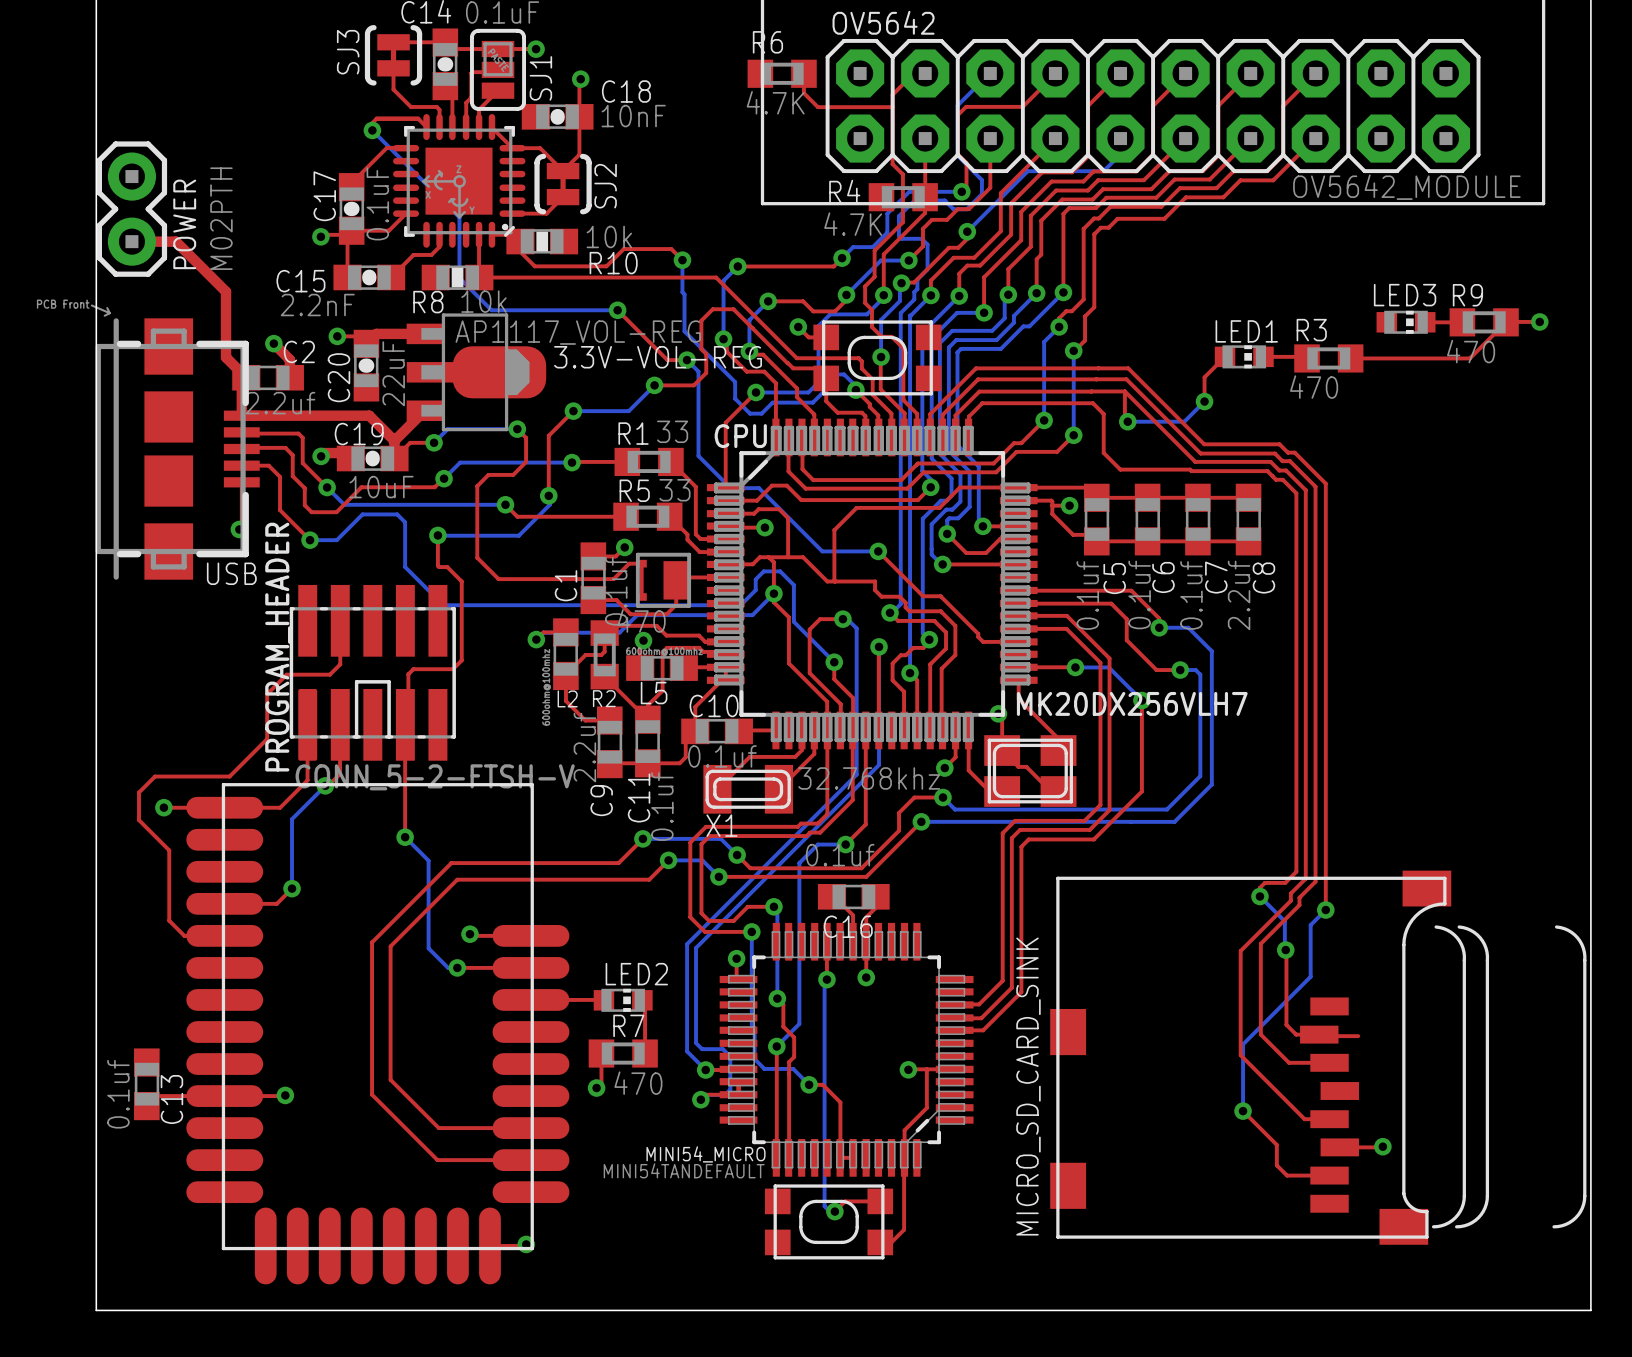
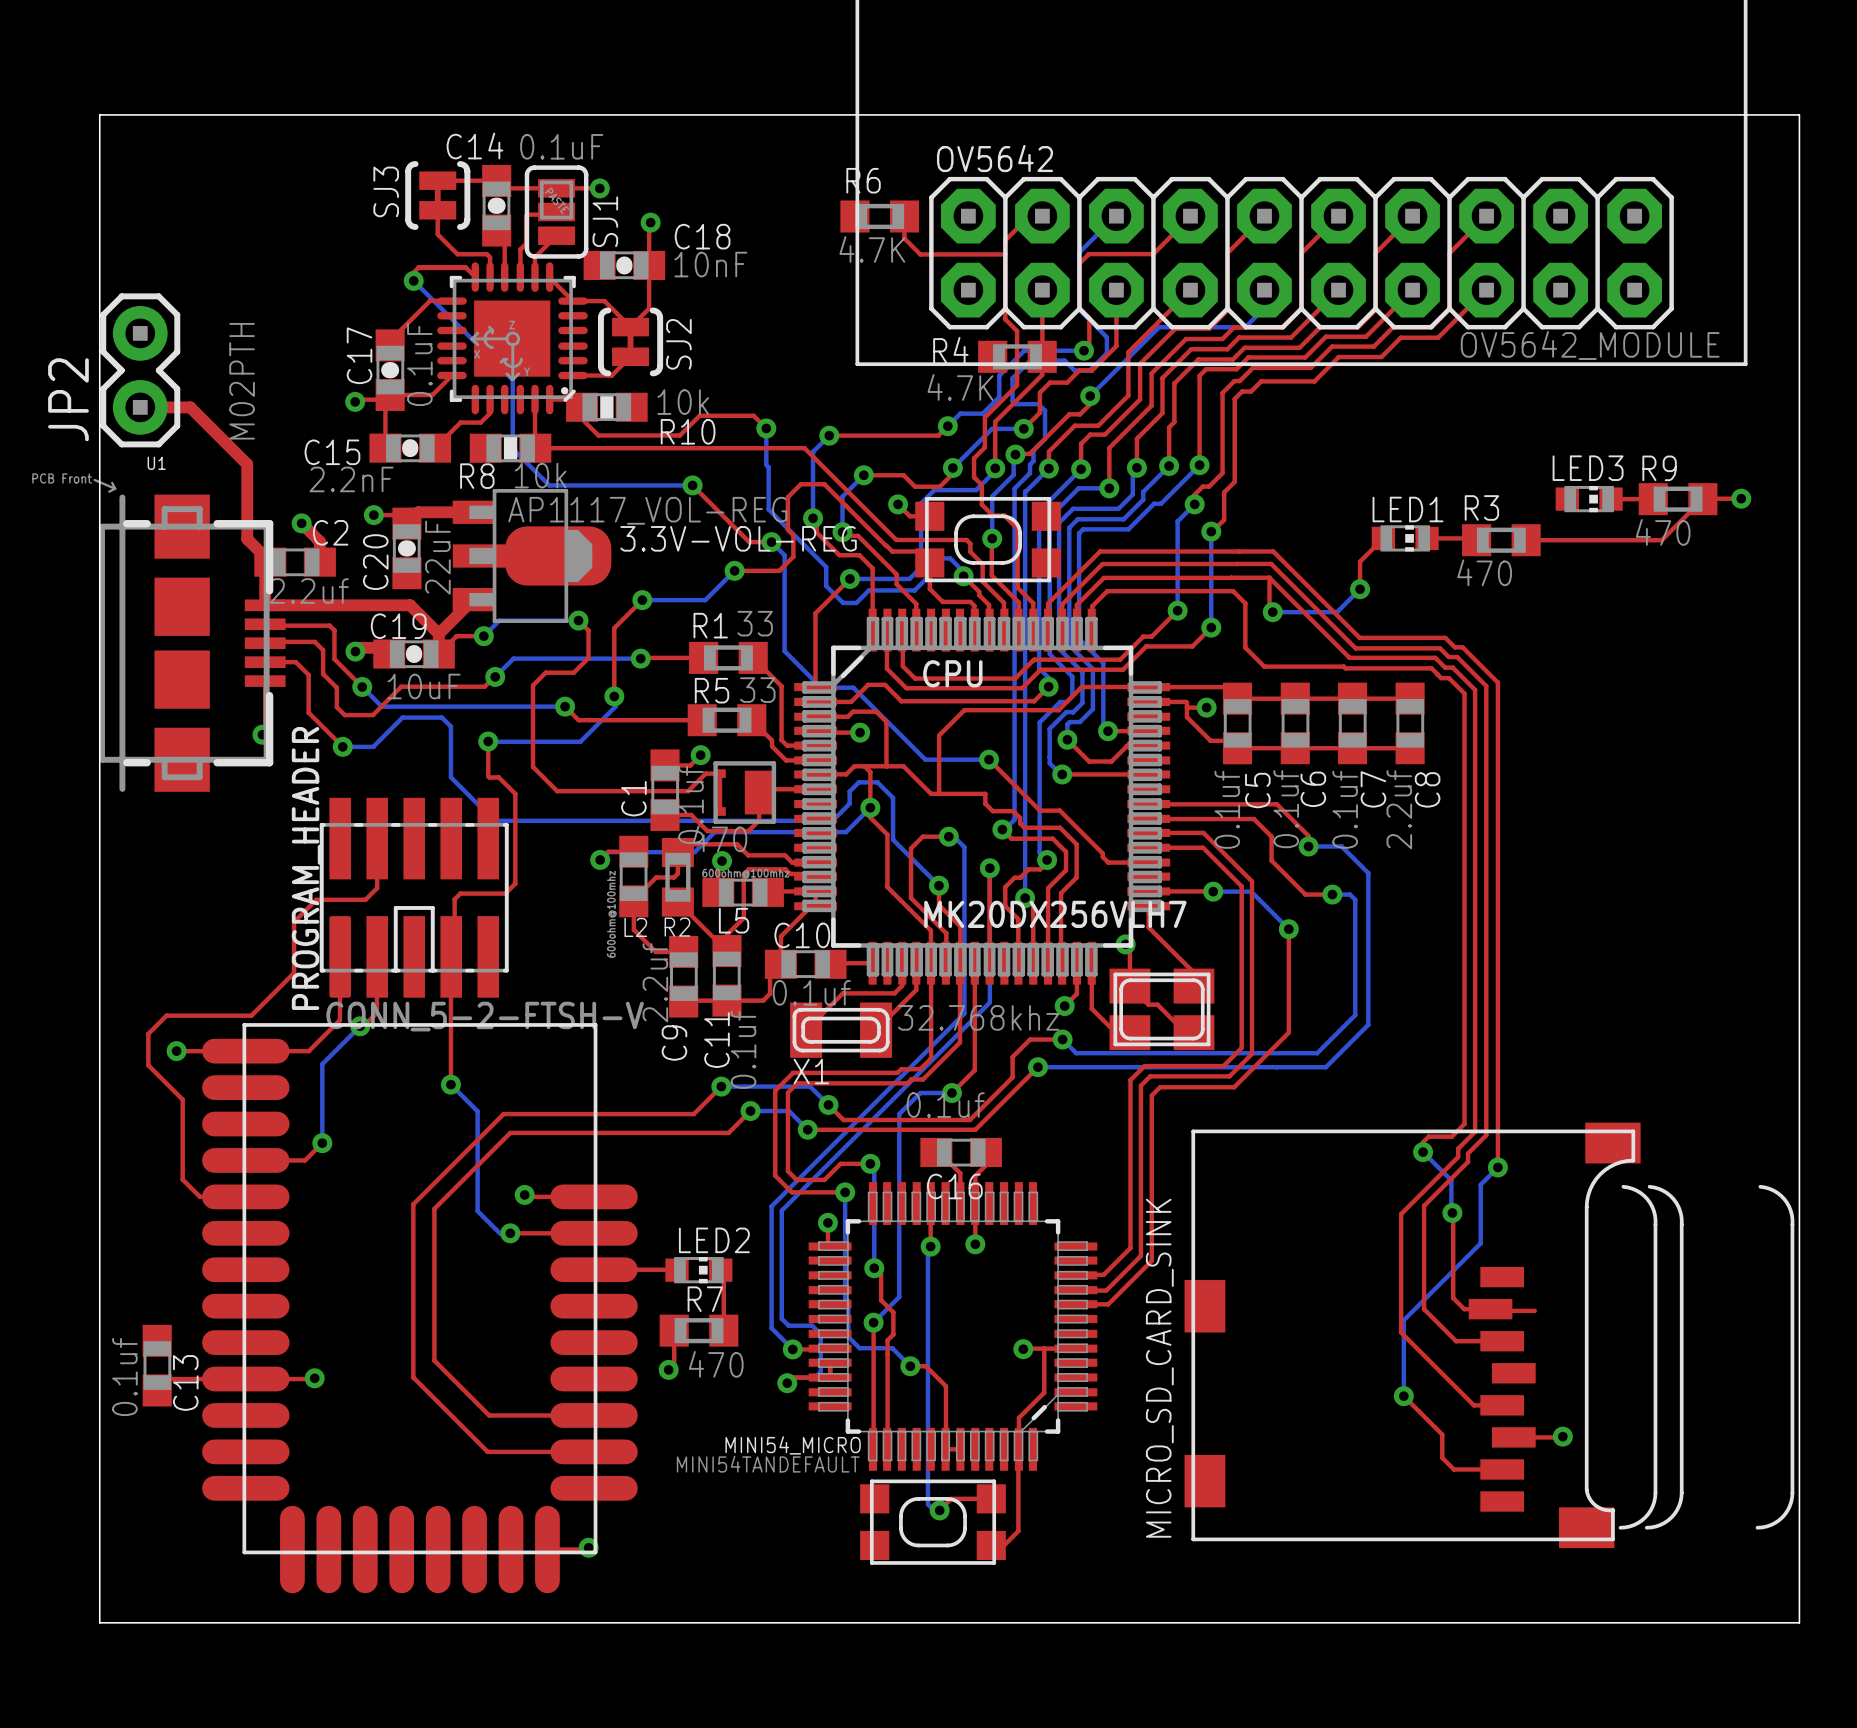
POWER name: POWER (184, 224) -> JP2 (68, 399)
CPU name position: CPU (740, 436) -> CPU (952, 673)
USB name: USB (231, 573) -> U1 (156, 463)
CPU value position: MK20DX256VLH7 (1132, 703) -> MK20DX256VLH7 (1055, 914)

